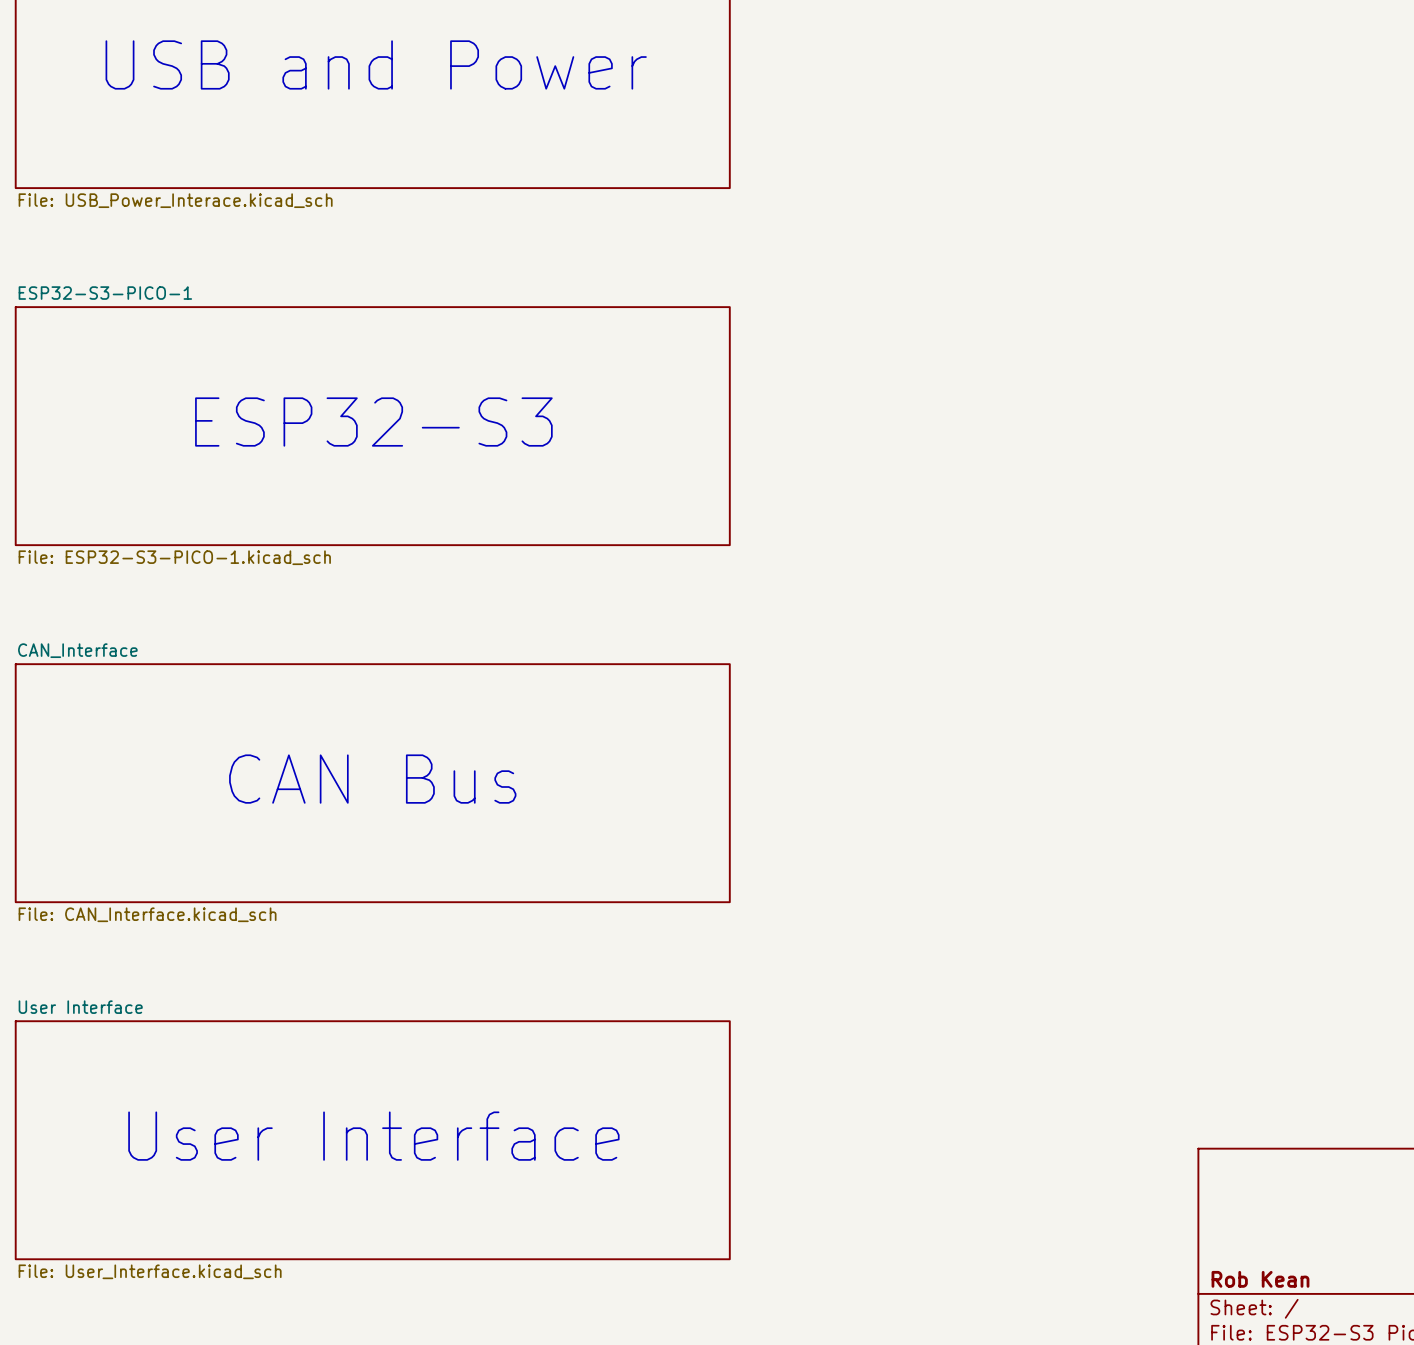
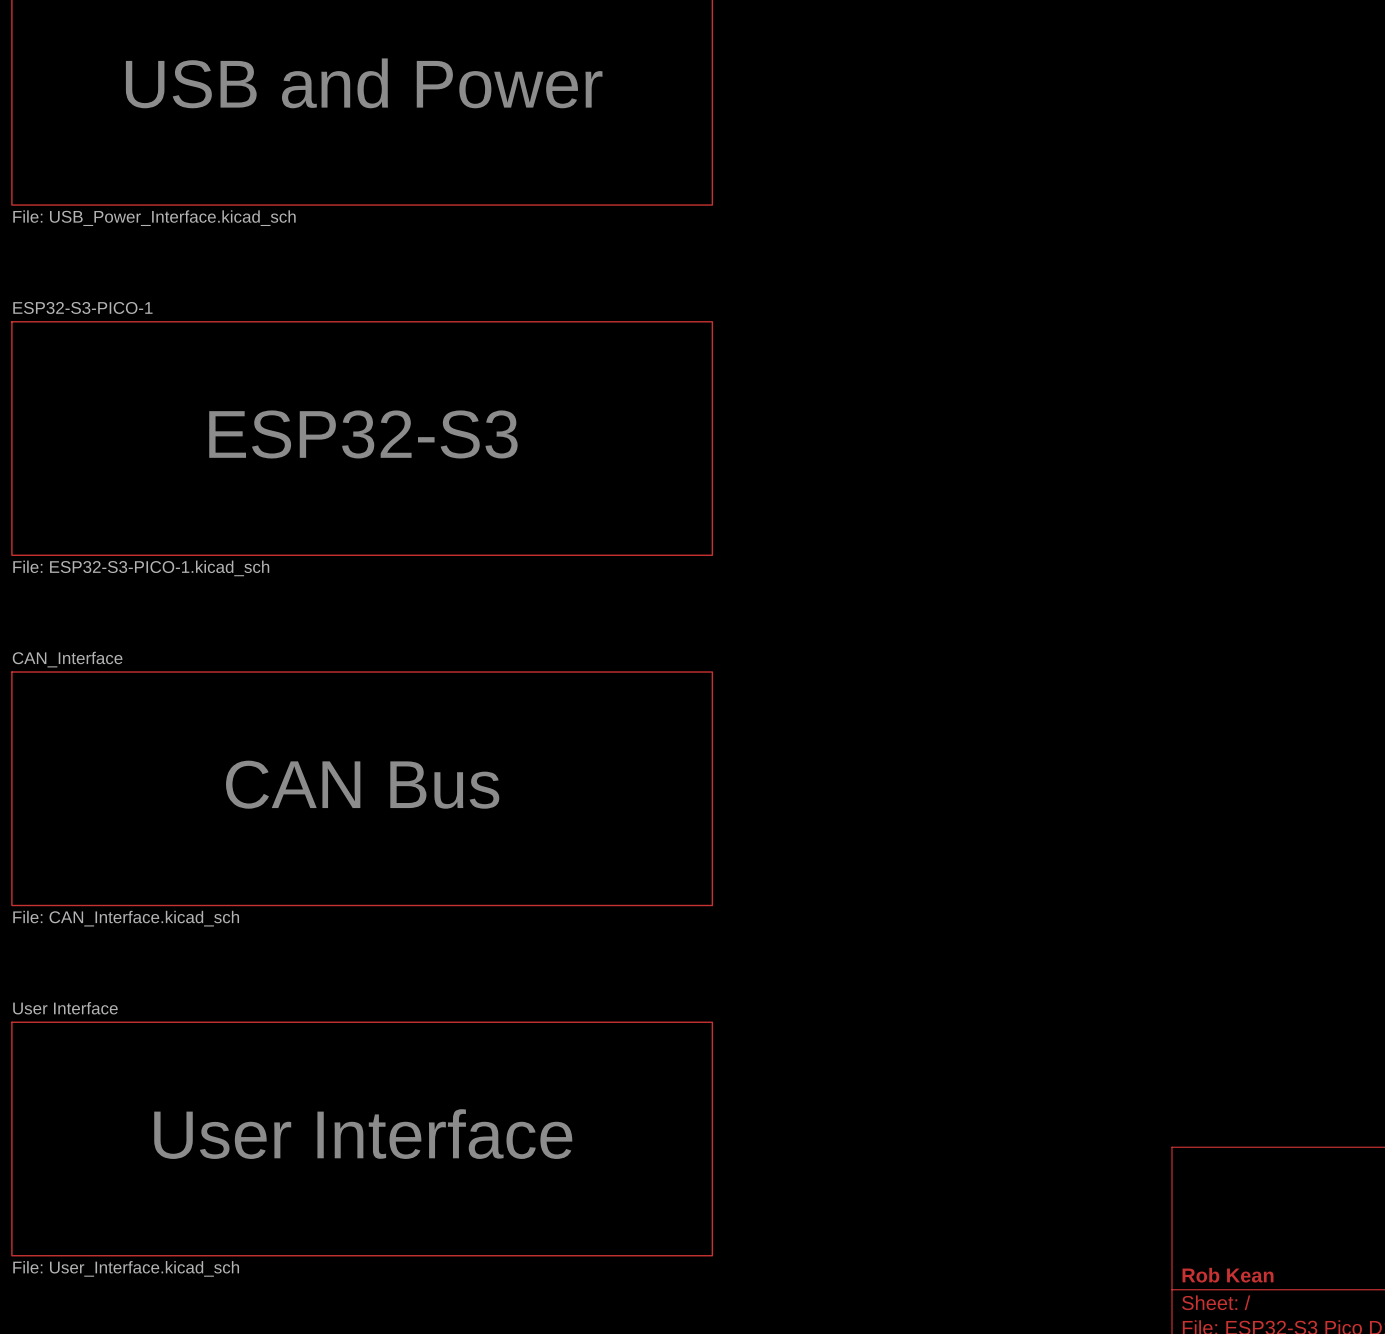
sheet value: File: USB_Power_Interace.kicad_sch (175, 200) -> File: USB_Power_Interface.kicad_sch (154, 218)

